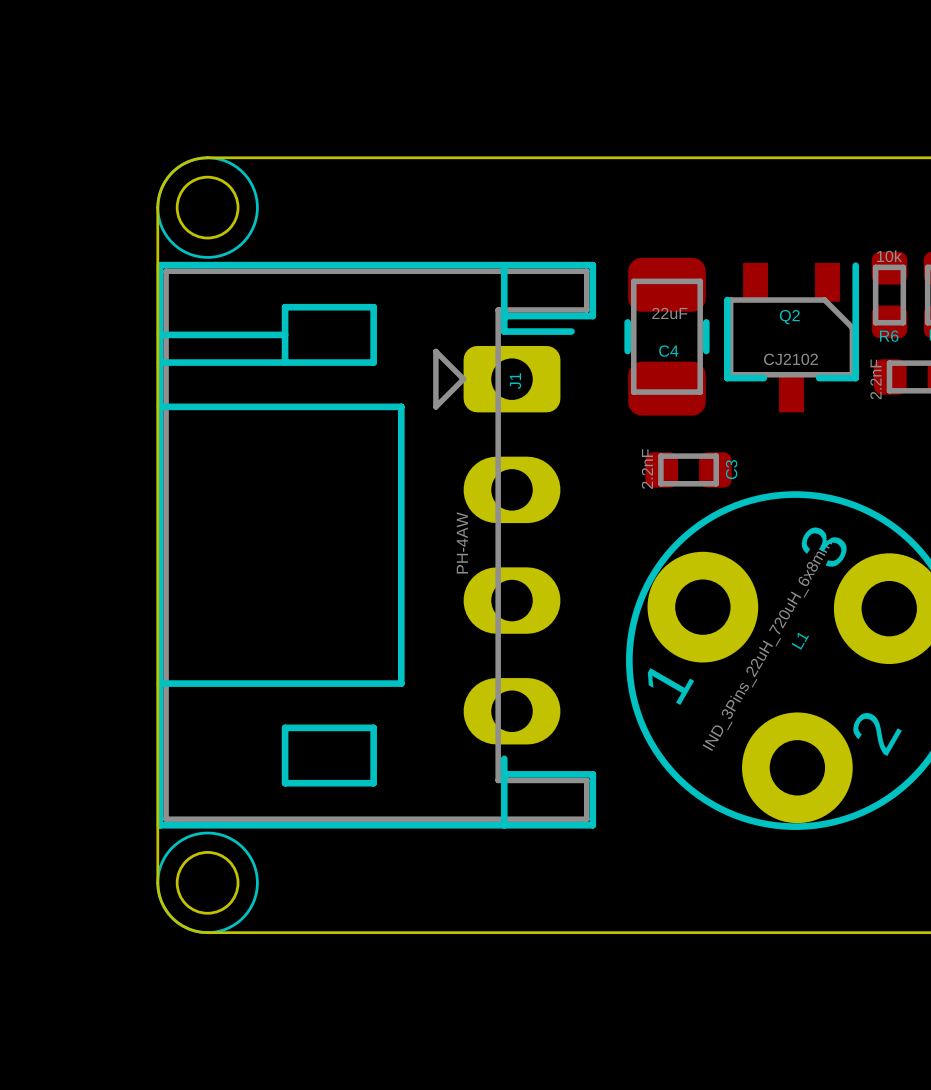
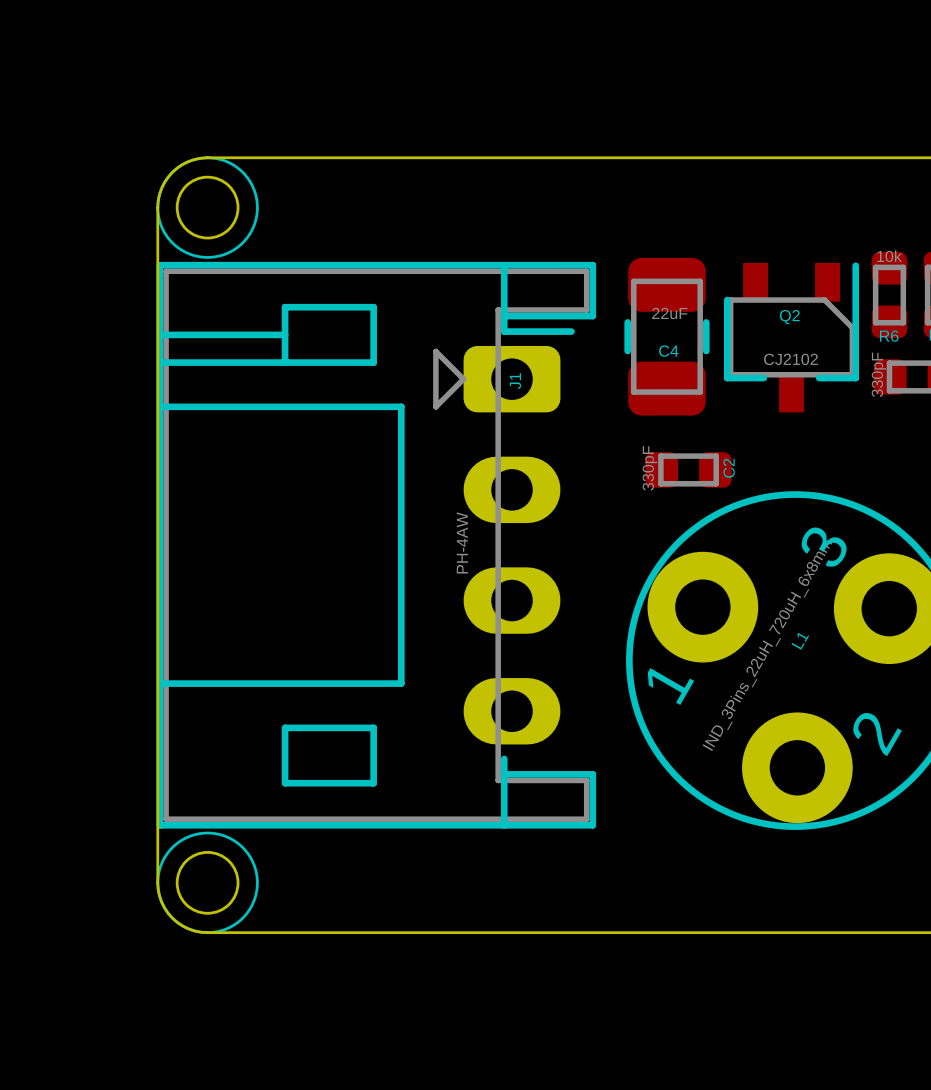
part value: 2.2nF (875, 379) -> 330pF (879, 374)
C3 value: 2.2nF (647, 469) -> 330pF (649, 468)
C3 name: C3 (731, 469) -> C2 (729, 468)

